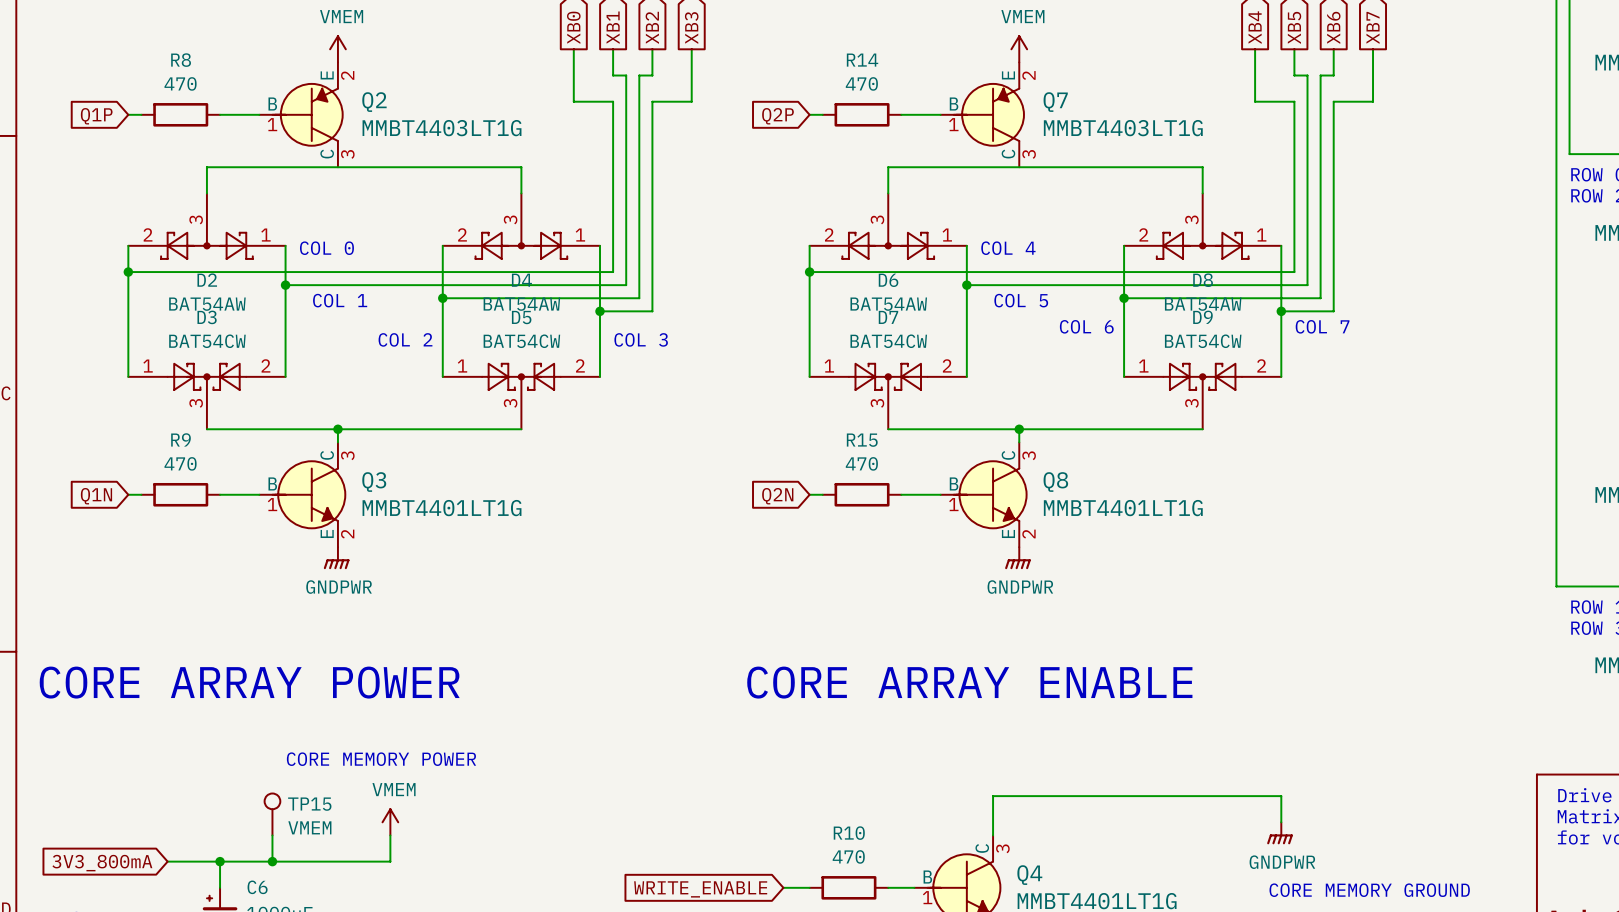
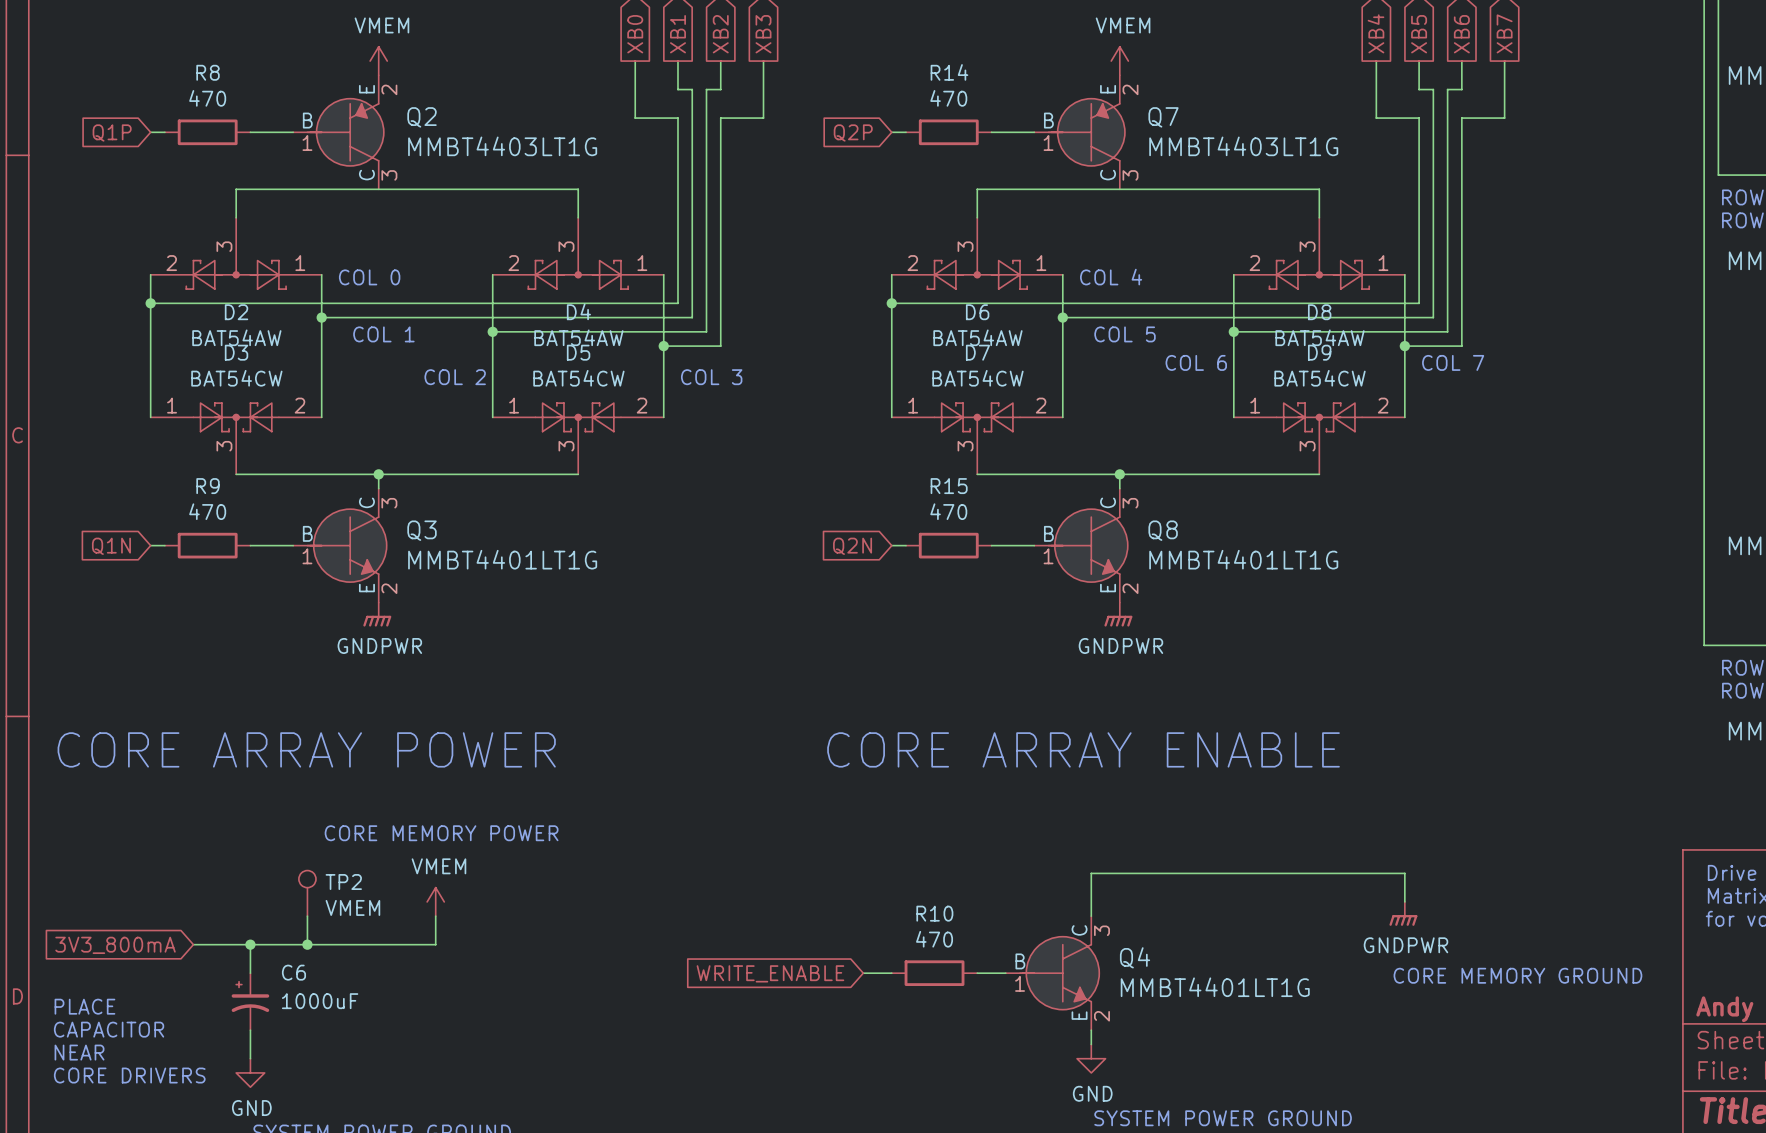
TP15 name: TP15 (309, 804) -> TP2 (343, 882)

